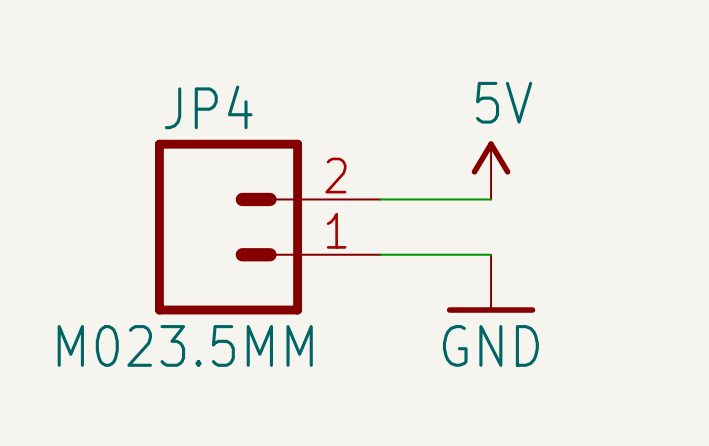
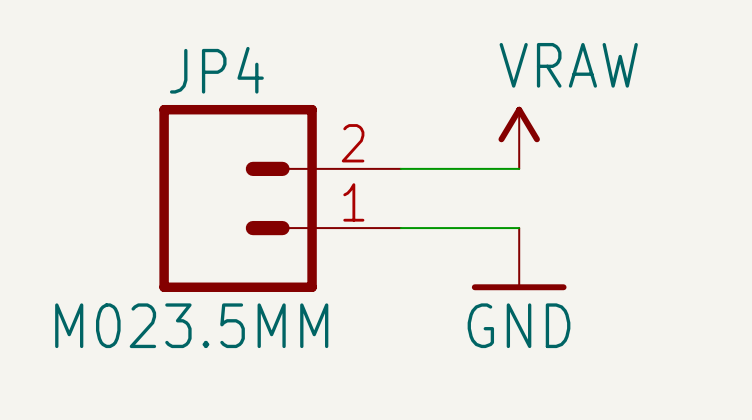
power symbol: 5V (491, 170) -> VRAW (519, 137)

